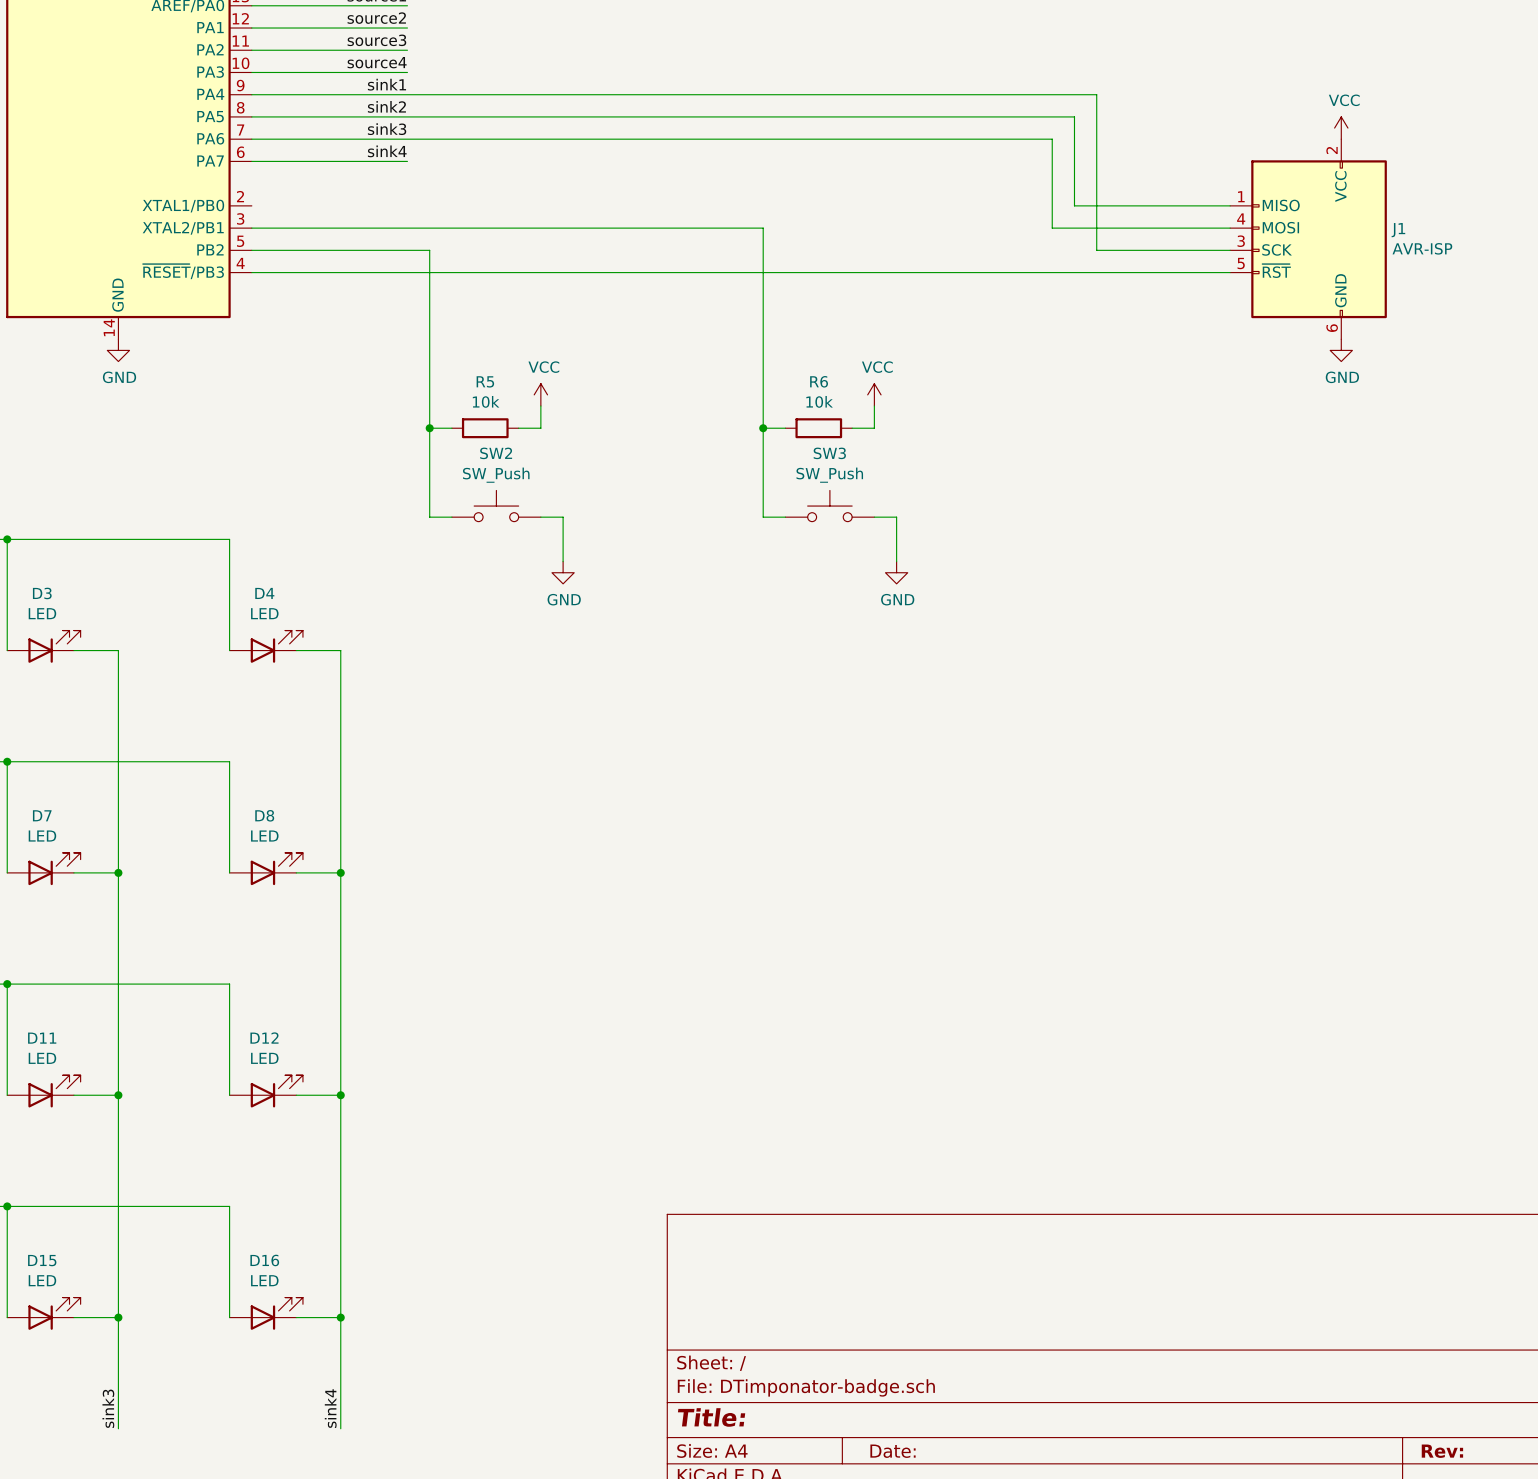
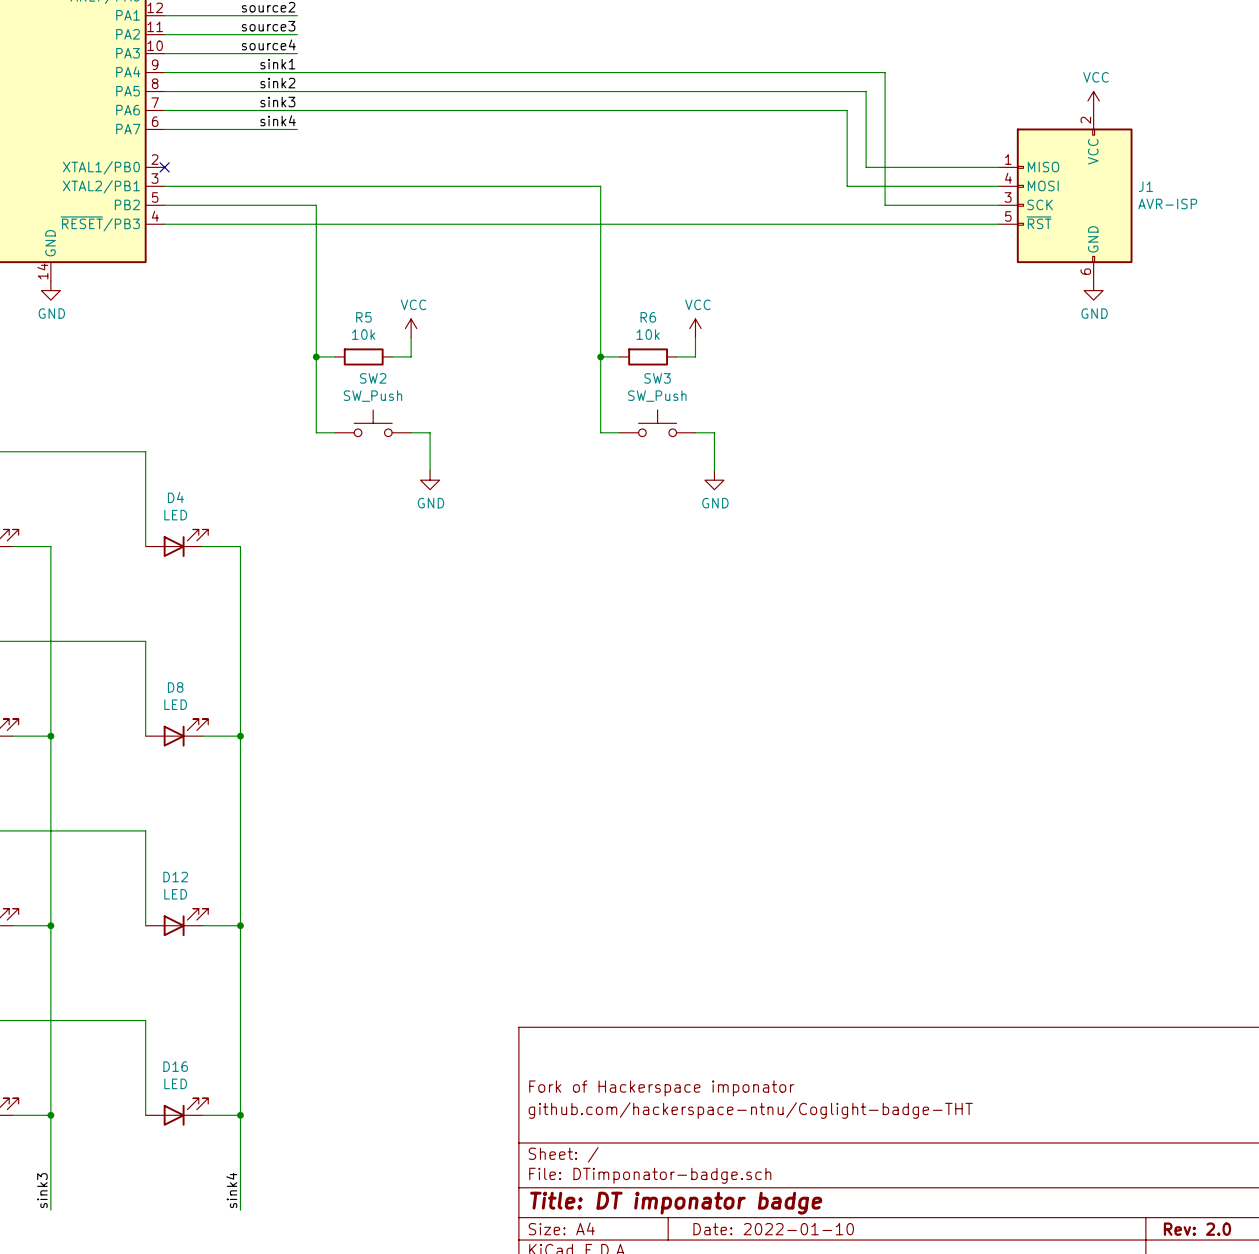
no-connect mark: none -> (164, 167)
title block: none -> Fork of Hackerspace imponator (661, 1088)
title block: none -> github.com/hackerspace-ntnu/Coglight-badge-THT (750, 1110)
title block: Title: (711, 1417) -> Title: DT imponator badge (676, 1203)
title block: Date: (893, 1451) -> Date: 2022-01-10 (773, 1229)
title block: Rev: (1442, 1451) -> Rev: 2.0 (1197, 1229)

